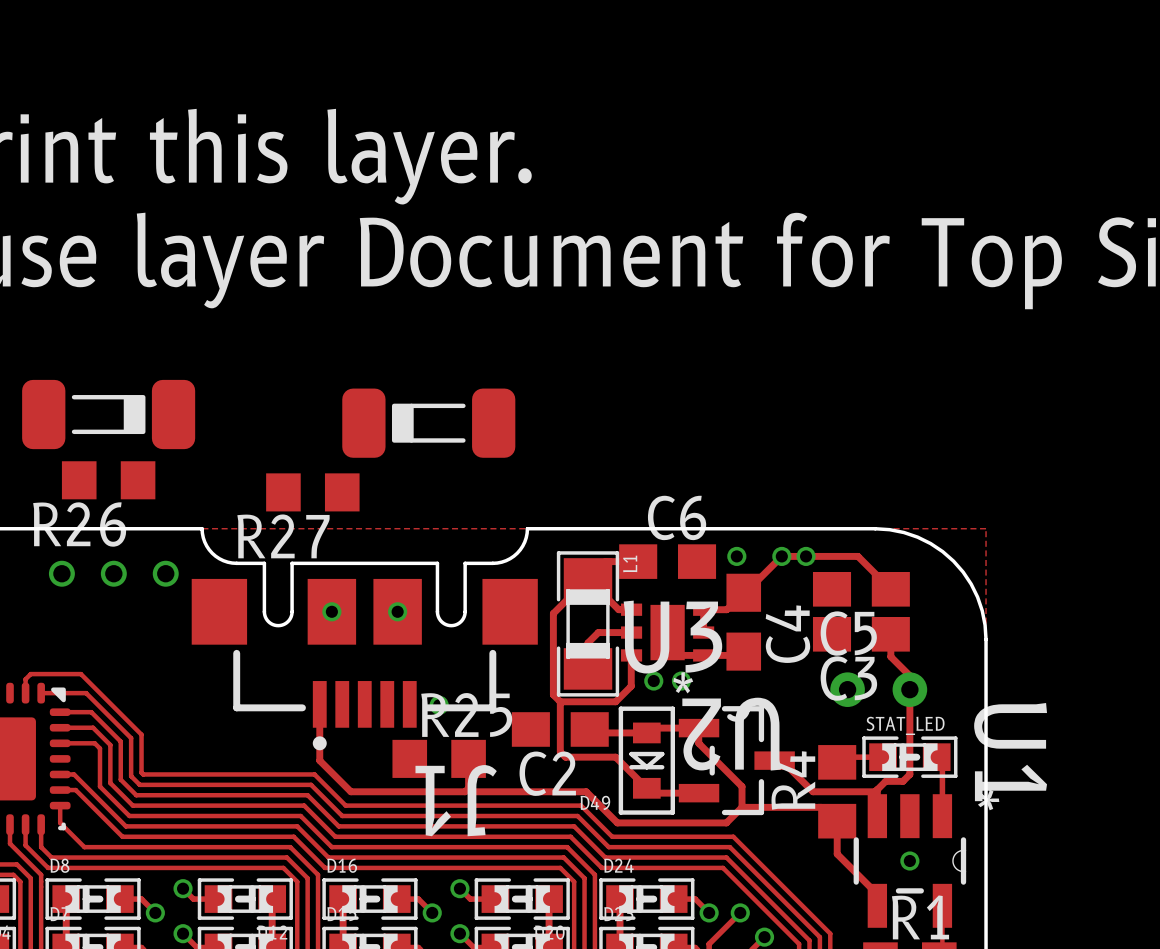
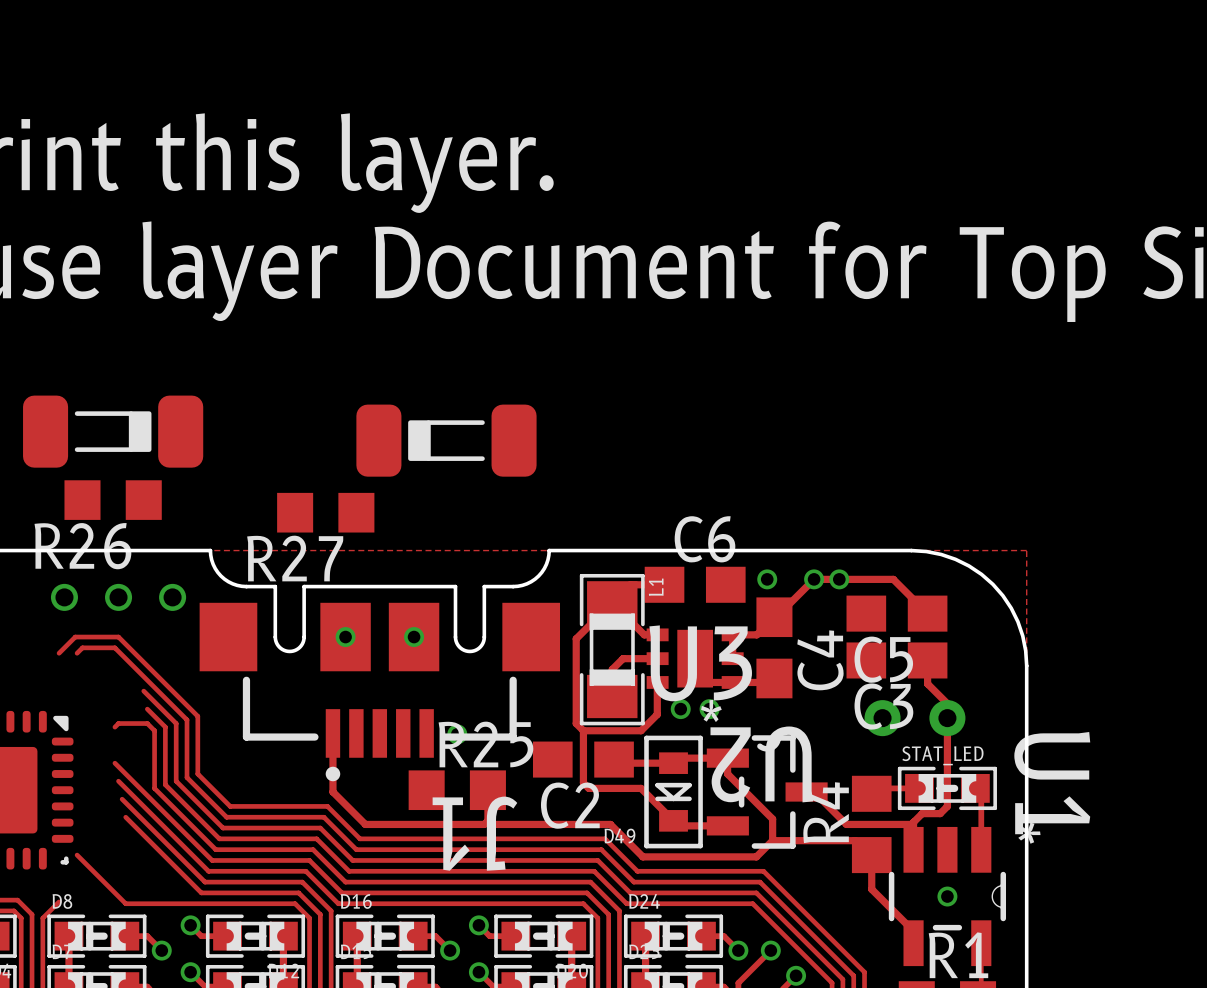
track: (25, 693) (25, 679) (30, 674) (80, 674) (141, 734) (141, 772) (143, 774) (221, 774) -> (59, 653) (75, 637) (118, 637) (197, 716) (197, 773) (230, 806)
track: (41, 693) (86, 693) (131, 738) (131, 776) (139, 784) (217, 784) -> (77, 653) (82, 647) (114, 647) (187, 719) (187, 777) (226, 817)
track: (60, 712) (91, 712) (120, 741) (120, 779) (136, 795) (214, 795) -> (143, 691) (176, 723) (176, 781) (223, 828)
track: (60, 727) (93, 727) (110, 745) (110, 783) (132, 805) (210, 805) -> (147, 709) (165, 727) (165, 784) (219, 838)
track: (60, 743) (94, 743) (99, 748) (99, 786) (129, 816) (207, 816) -> (114, 727) (118, 723) (147, 723) (154, 730) (154, 788) (215, 849)
track: (60, 774) (74, 774) (125, 826) (203, 826) -> (114, 763) (212, 860)
track: (60, 790) (75, 790) (122, 836) (200, 836) -> (118, 781) (208, 871)
track: (60, 805) (60, 822) (84, 847) (196, 847) -> (122, 799) (205, 882)
track: (10, 824) (10, 843) (41, 874) (41, 881) -> (59, 901) (42, 918)
track: (25, 824) (25, 845) (48, 867) (120, 867) -> (77, 855) (125, 903)
track: (41, 824) (41, 847) (51, 857) (193, 857) -> (125, 817) (201, 892)

